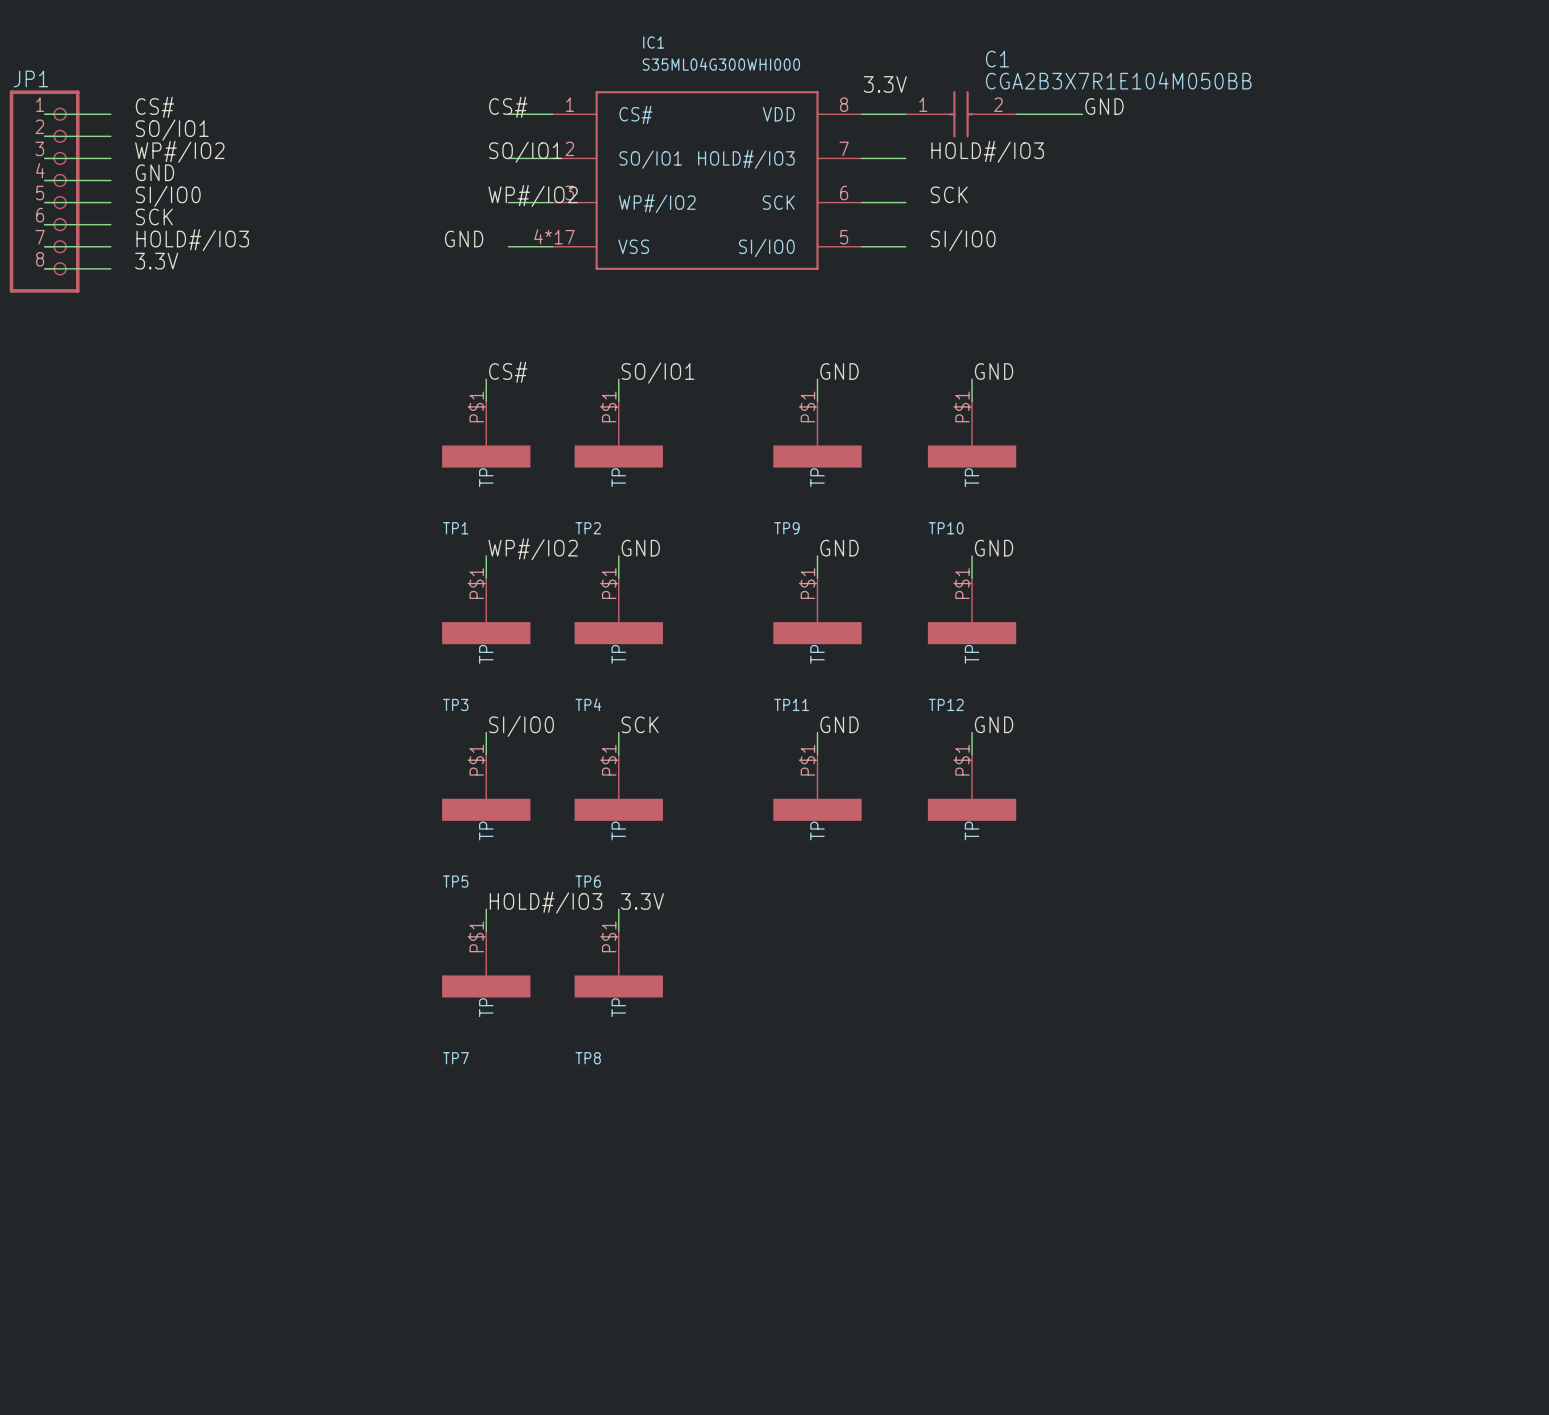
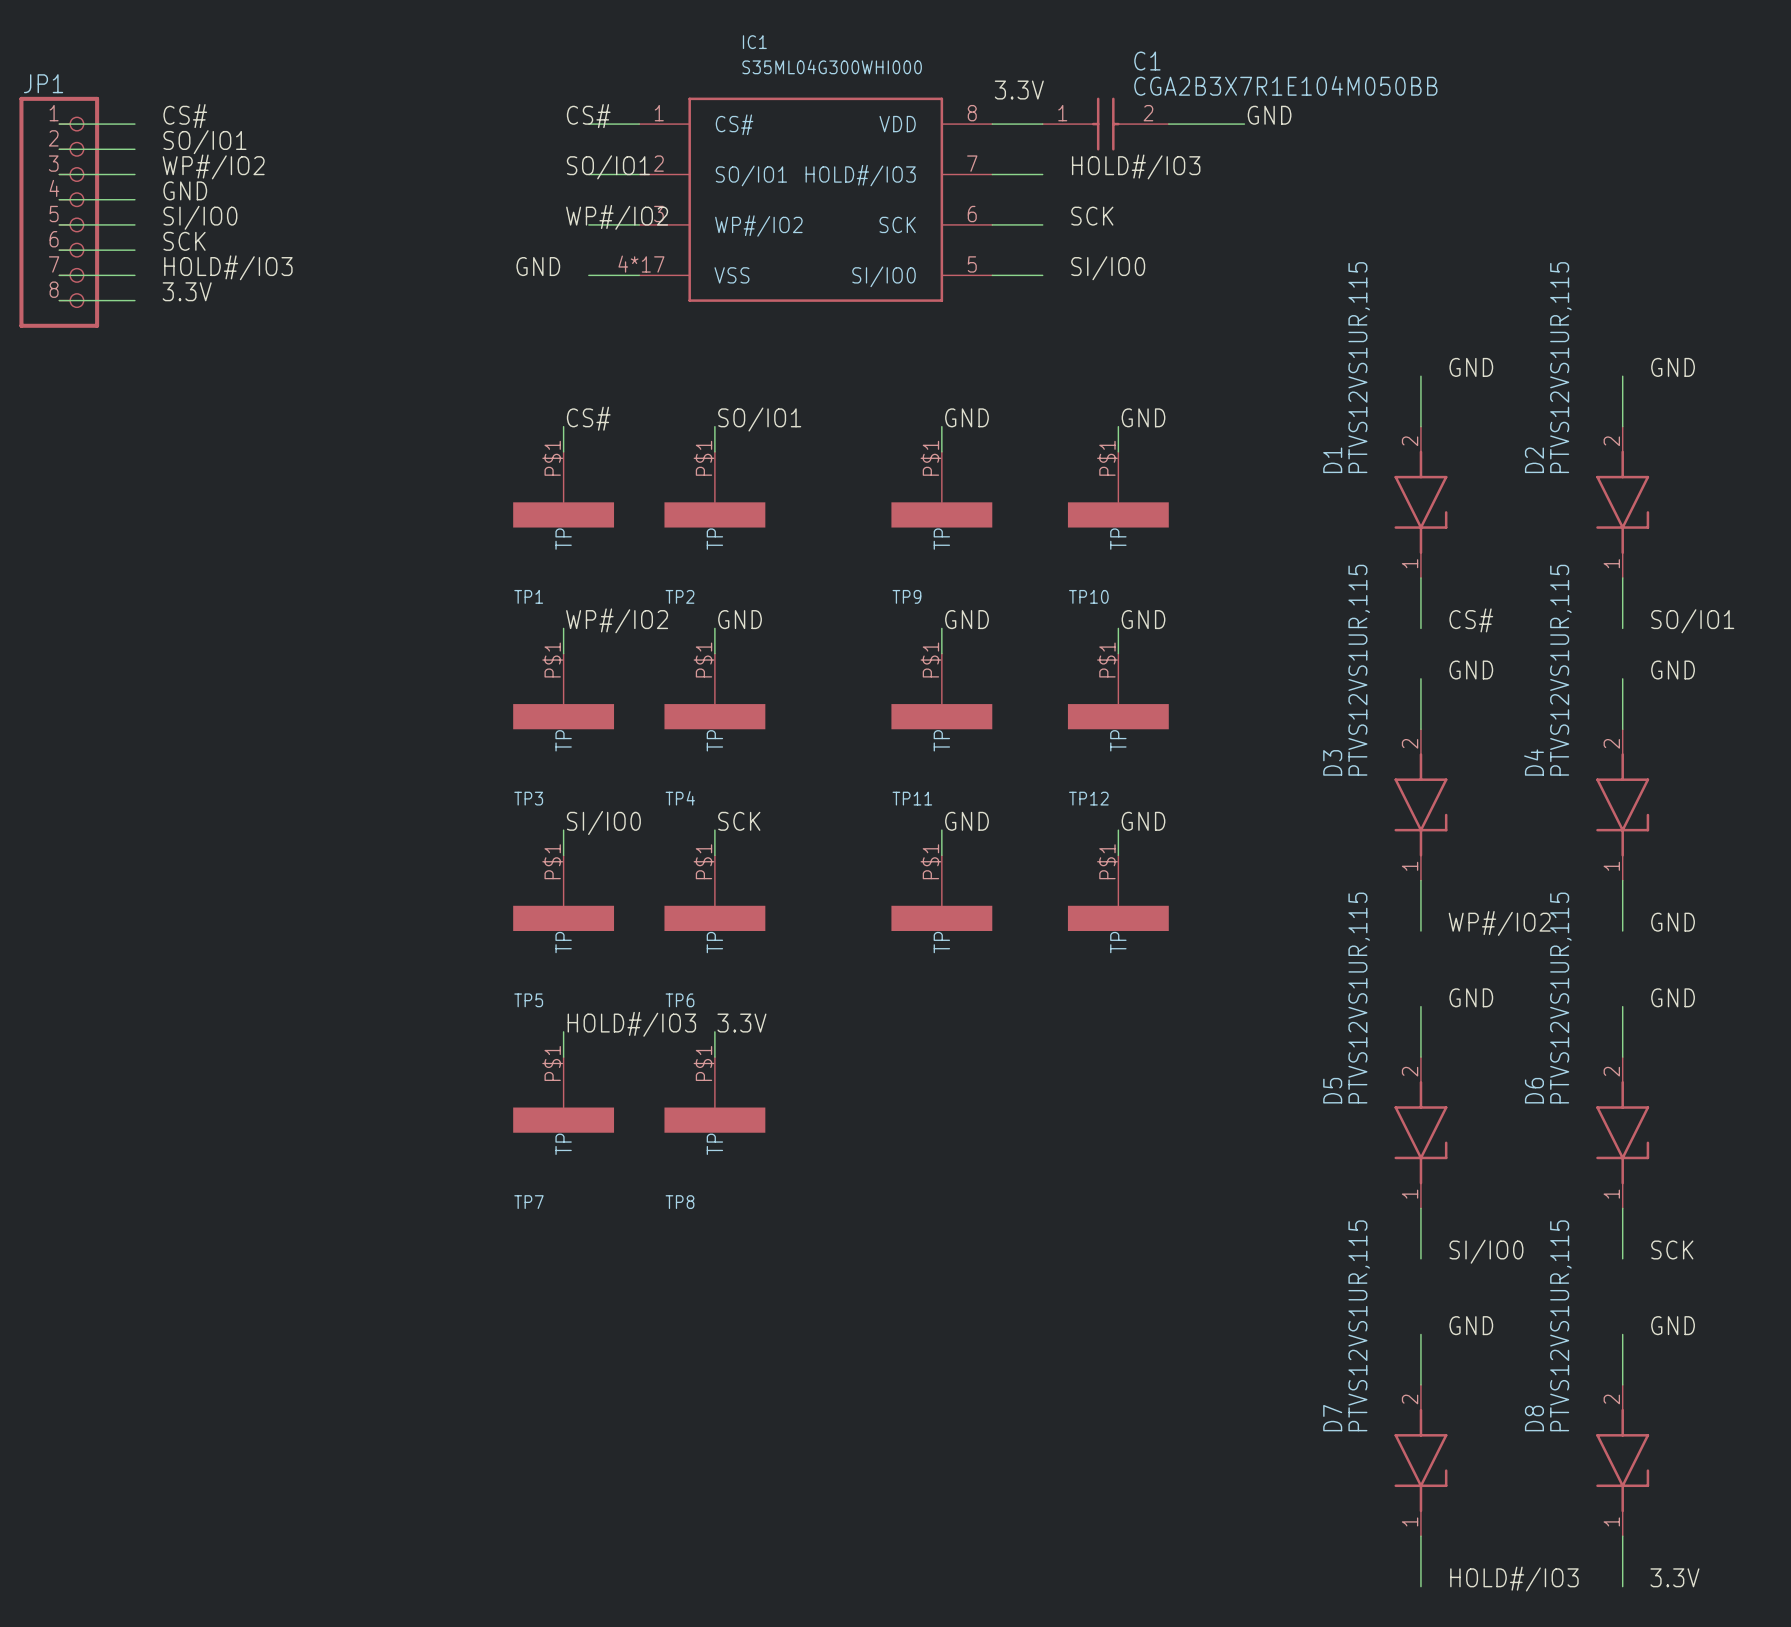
label: none -> GND (1471, 367)
label: none -> GND (1673, 367)
wire: none -> (1420, 376) (1420, 426)
wire: none -> (1622, 376) (1622, 426)
D1: none -> PTVS12VS1UR,115 (1420, 502)
D2: none -> PTVS12VS1UR,115 (1622, 502)
wire: none -> (1420, 577) (1420, 628)
wire: none -> (1622, 577) (1622, 628)
label: none -> CS# (1471, 620)
label: none -> SO/IO1 (1692, 621)
label: none -> GND (1471, 670)
label: none -> GND (1673, 670)
wire: none -> (1420, 678) (1420, 729)
wire: none -> (1622, 678) (1622, 729)
D3: none -> PTVS12VS1UR,115 (1420, 804)
D4: none -> PTVS12VS1UR,115 (1622, 804)
wire: none -> (1420, 880) (1420, 931)
wire: none -> (1622, 880) (1622, 931)
label: none -> GND (1673, 922)
label: none -> WP#/IO2 (1499, 923)
label: none -> GND (1471, 997)
label: none -> GND (1673, 997)
wire: none -> (1420, 1006) (1420, 1057)
wire: none -> (1622, 1006) (1622, 1057)
D5: none -> PTVS12VS1UR,115 (1420, 1132)
D6: none -> PTVS12VS1UR,115 (1622, 1132)
wire: none -> (1420, 1208) (1420, 1258)
wire: none -> (1622, 1208) (1622, 1258)
label: none -> SCK (1672, 1249)
label: none -> SI/IO0 (1486, 1251)
label: none -> GND (1471, 1325)
label: none -> GND (1673, 1325)
wire: none -> (1420, 1334) (1420, 1384)
wire: none -> (1622, 1334) (1622, 1384)
D7: none -> PTVS12VS1UR,115 (1420, 1460)
D8: none -> PTVS12VS1UR,115 (1622, 1460)
wire: none -> (1420, 1536) (1420, 1586)
wire: none -> (1622, 1536) (1622, 1586)
label: none -> 3.3V (1674, 1577)
label: none -> HOLD#/IO3 (1514, 1579)

